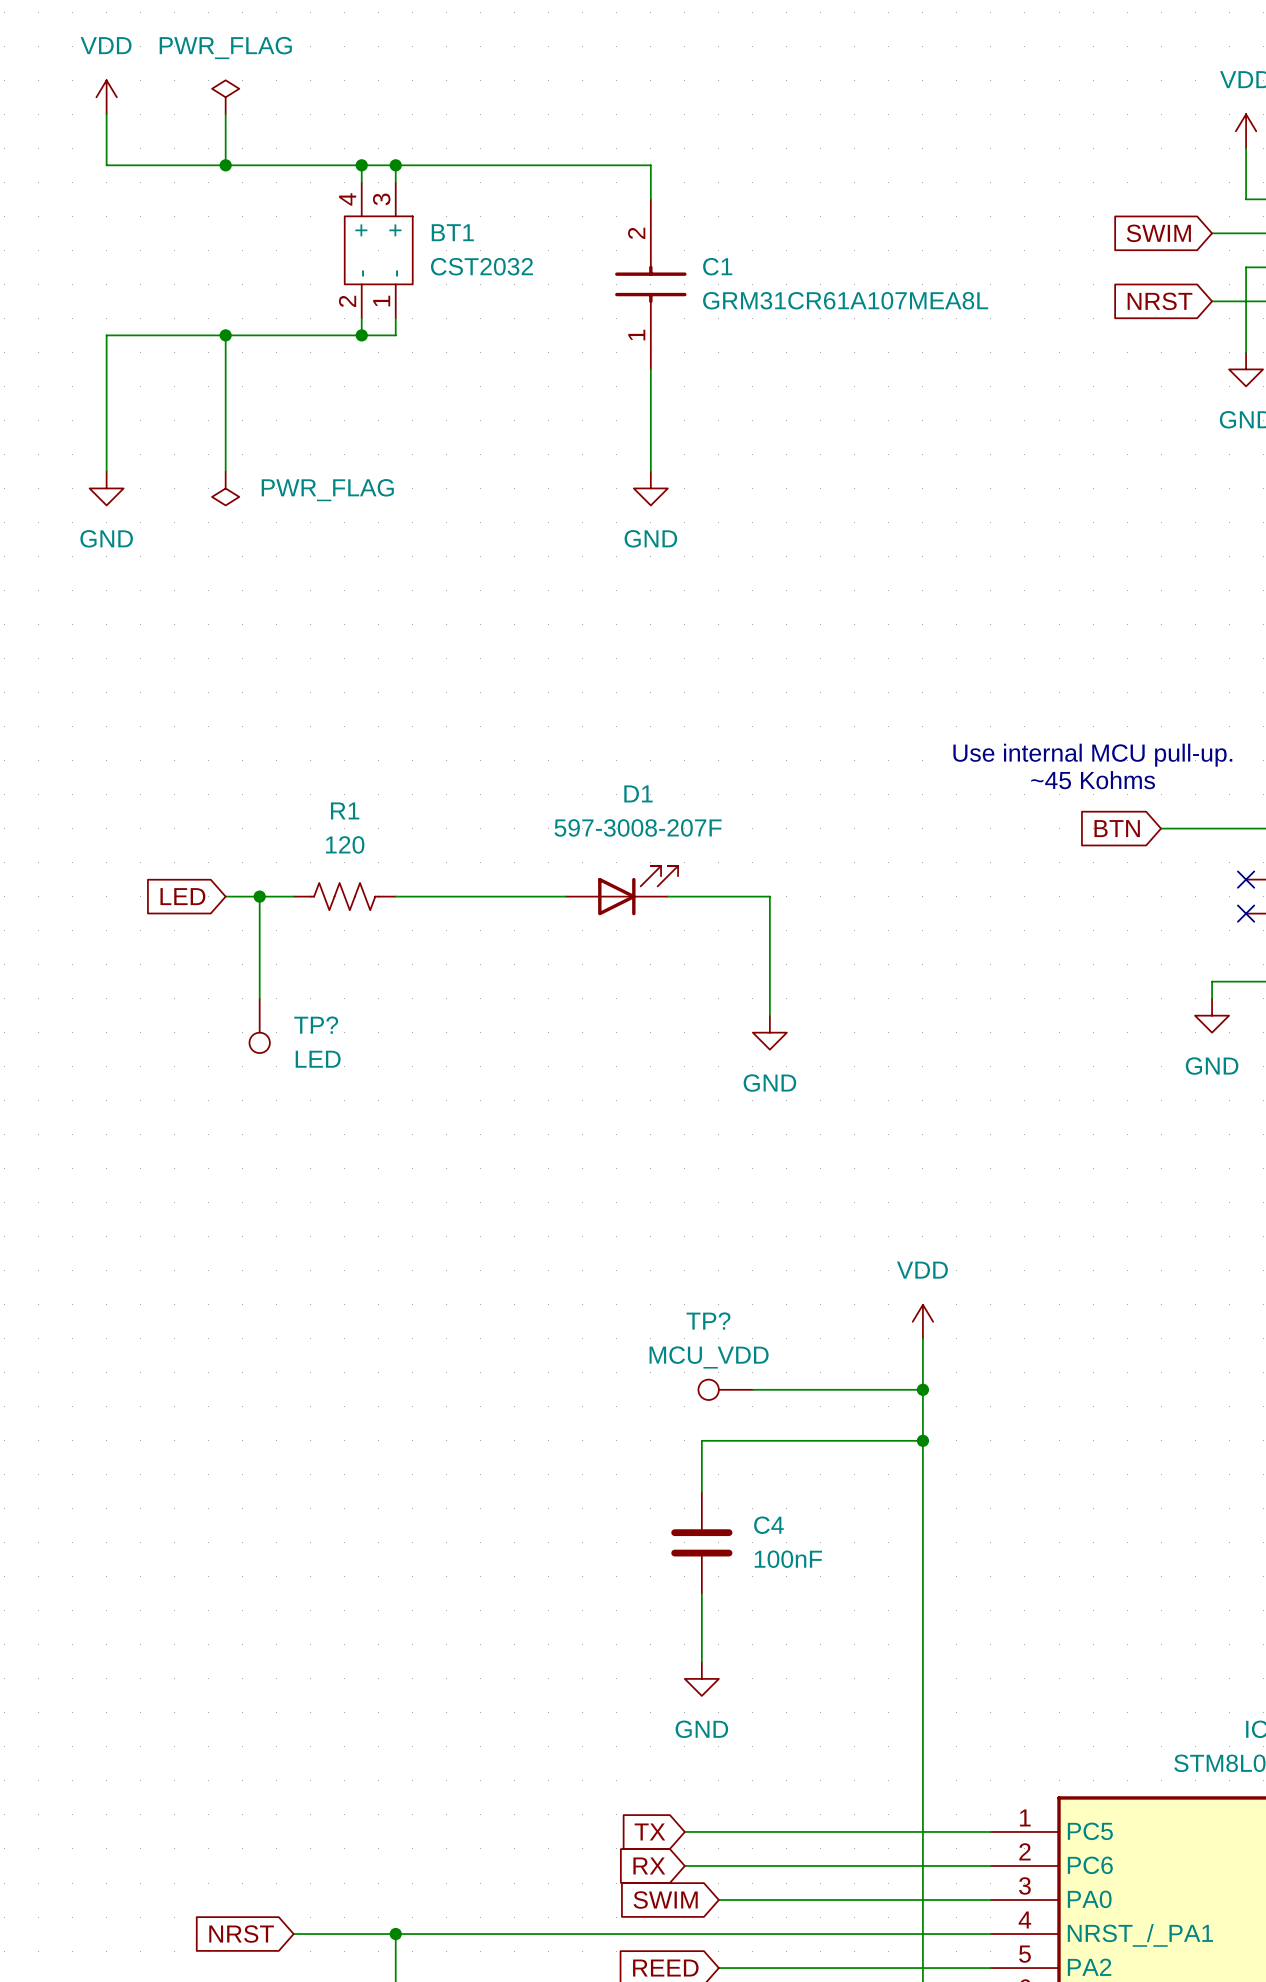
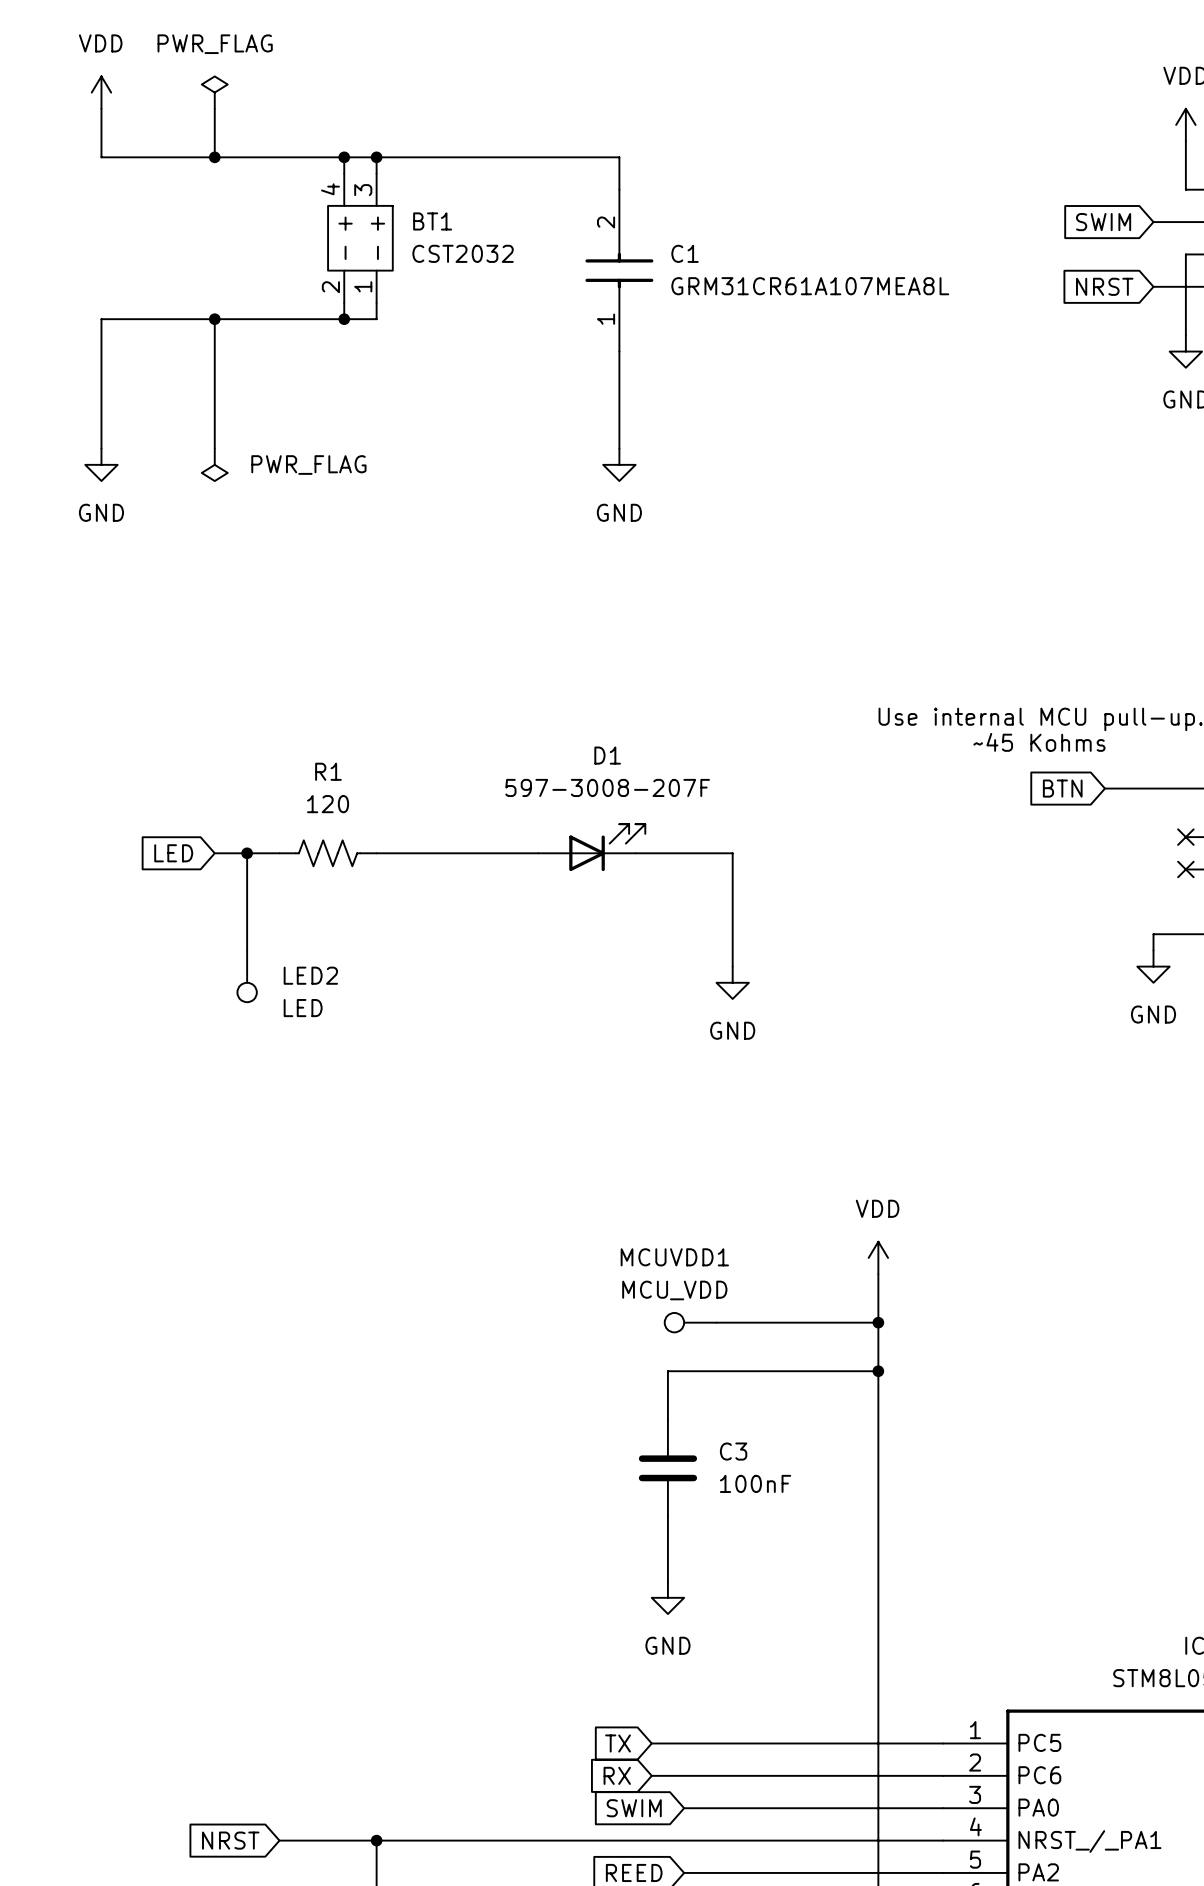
TP? name: TP? (316, 1025) -> LED2 (310, 975)
TP? name: TP? (708, 1321) -> MCUVDD1 (674, 1257)
C4 name: C4 (768, 1525) -> C3 (733, 1451)

